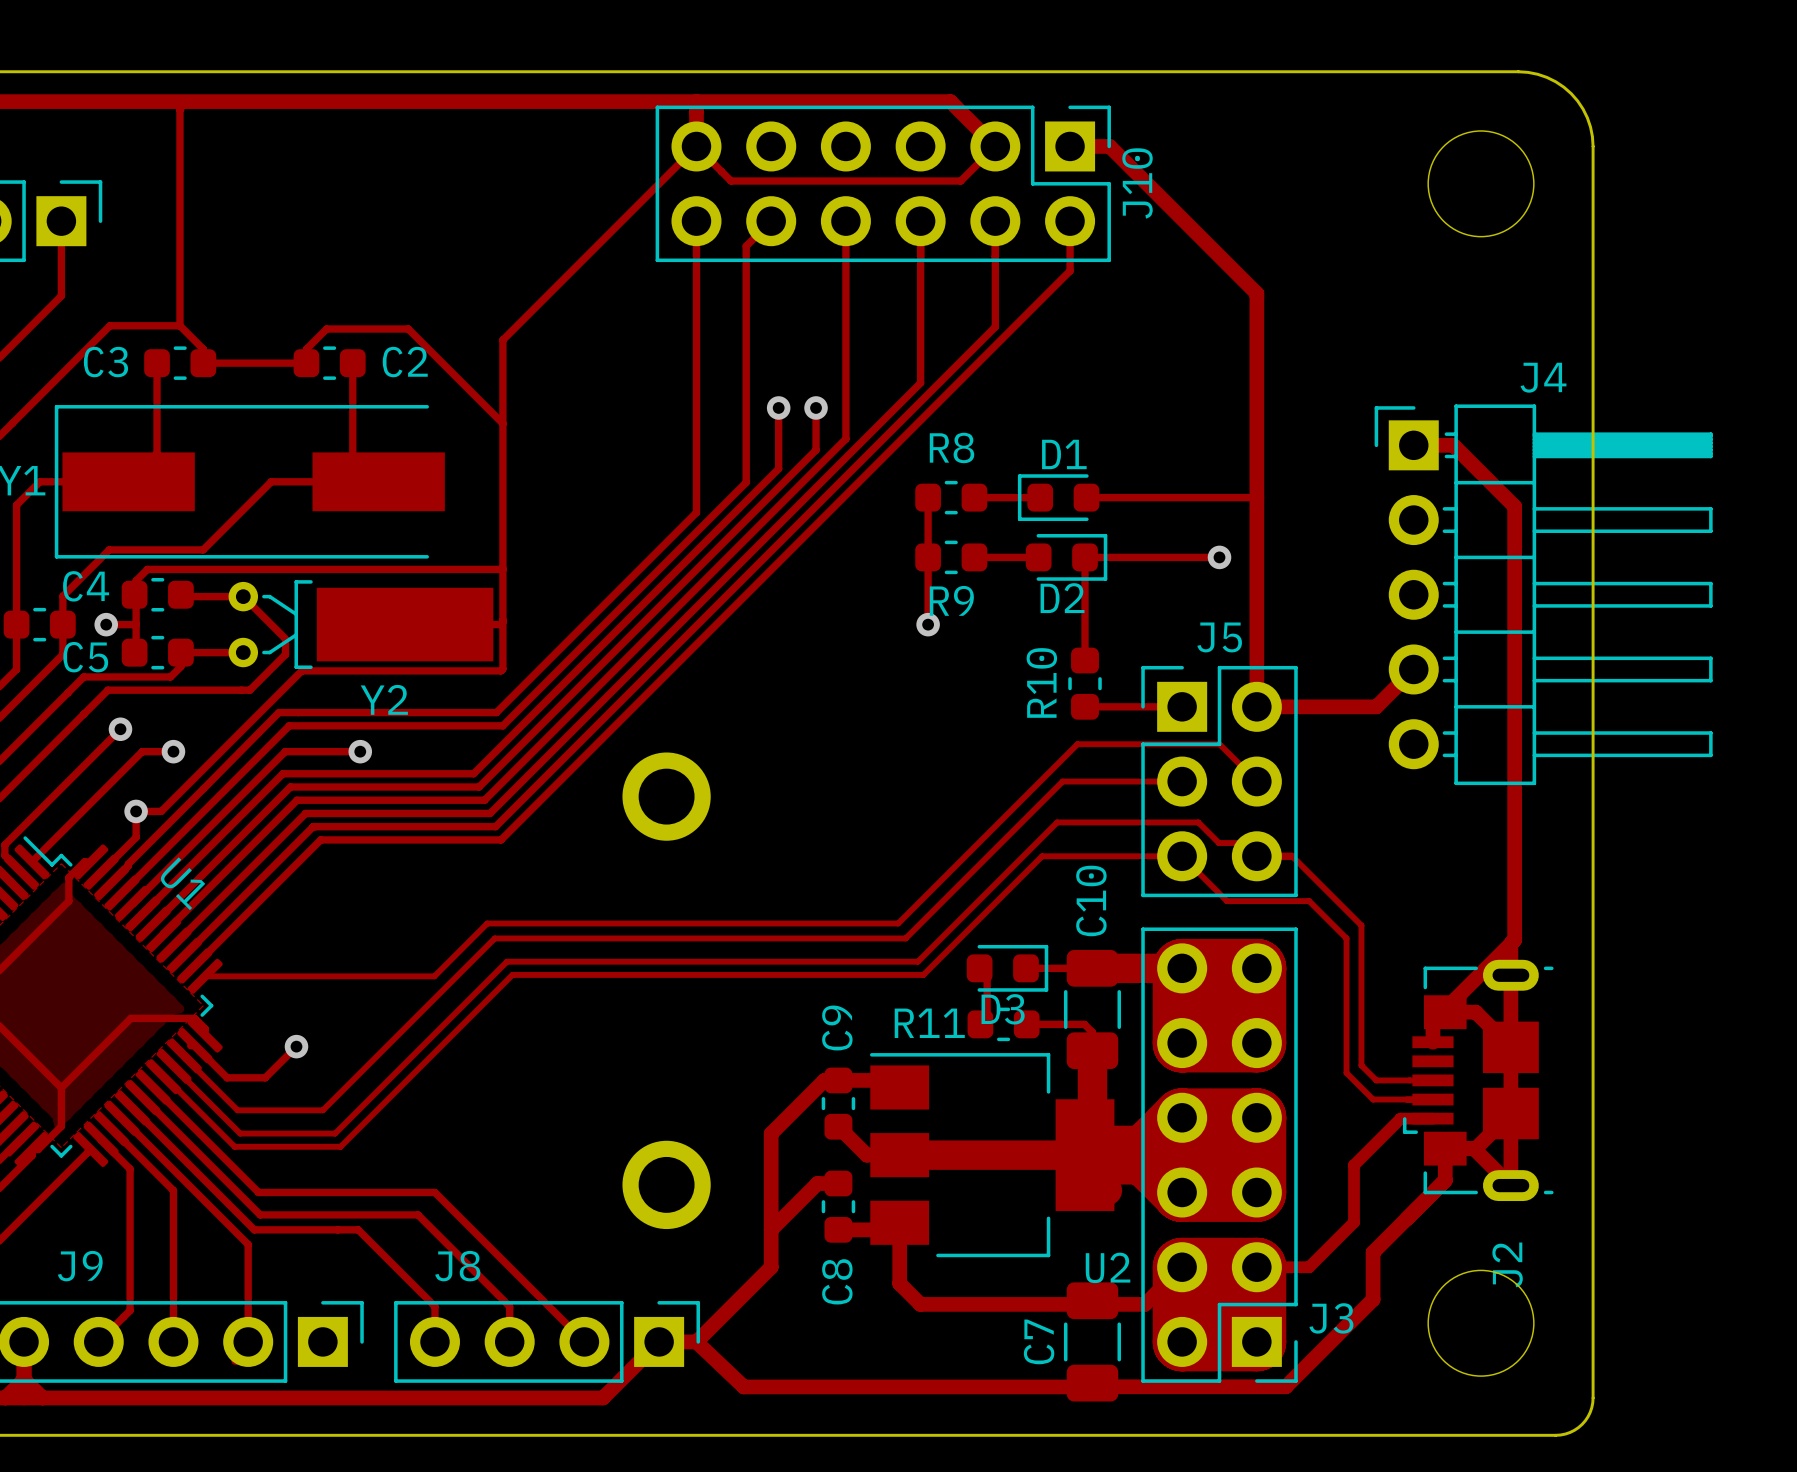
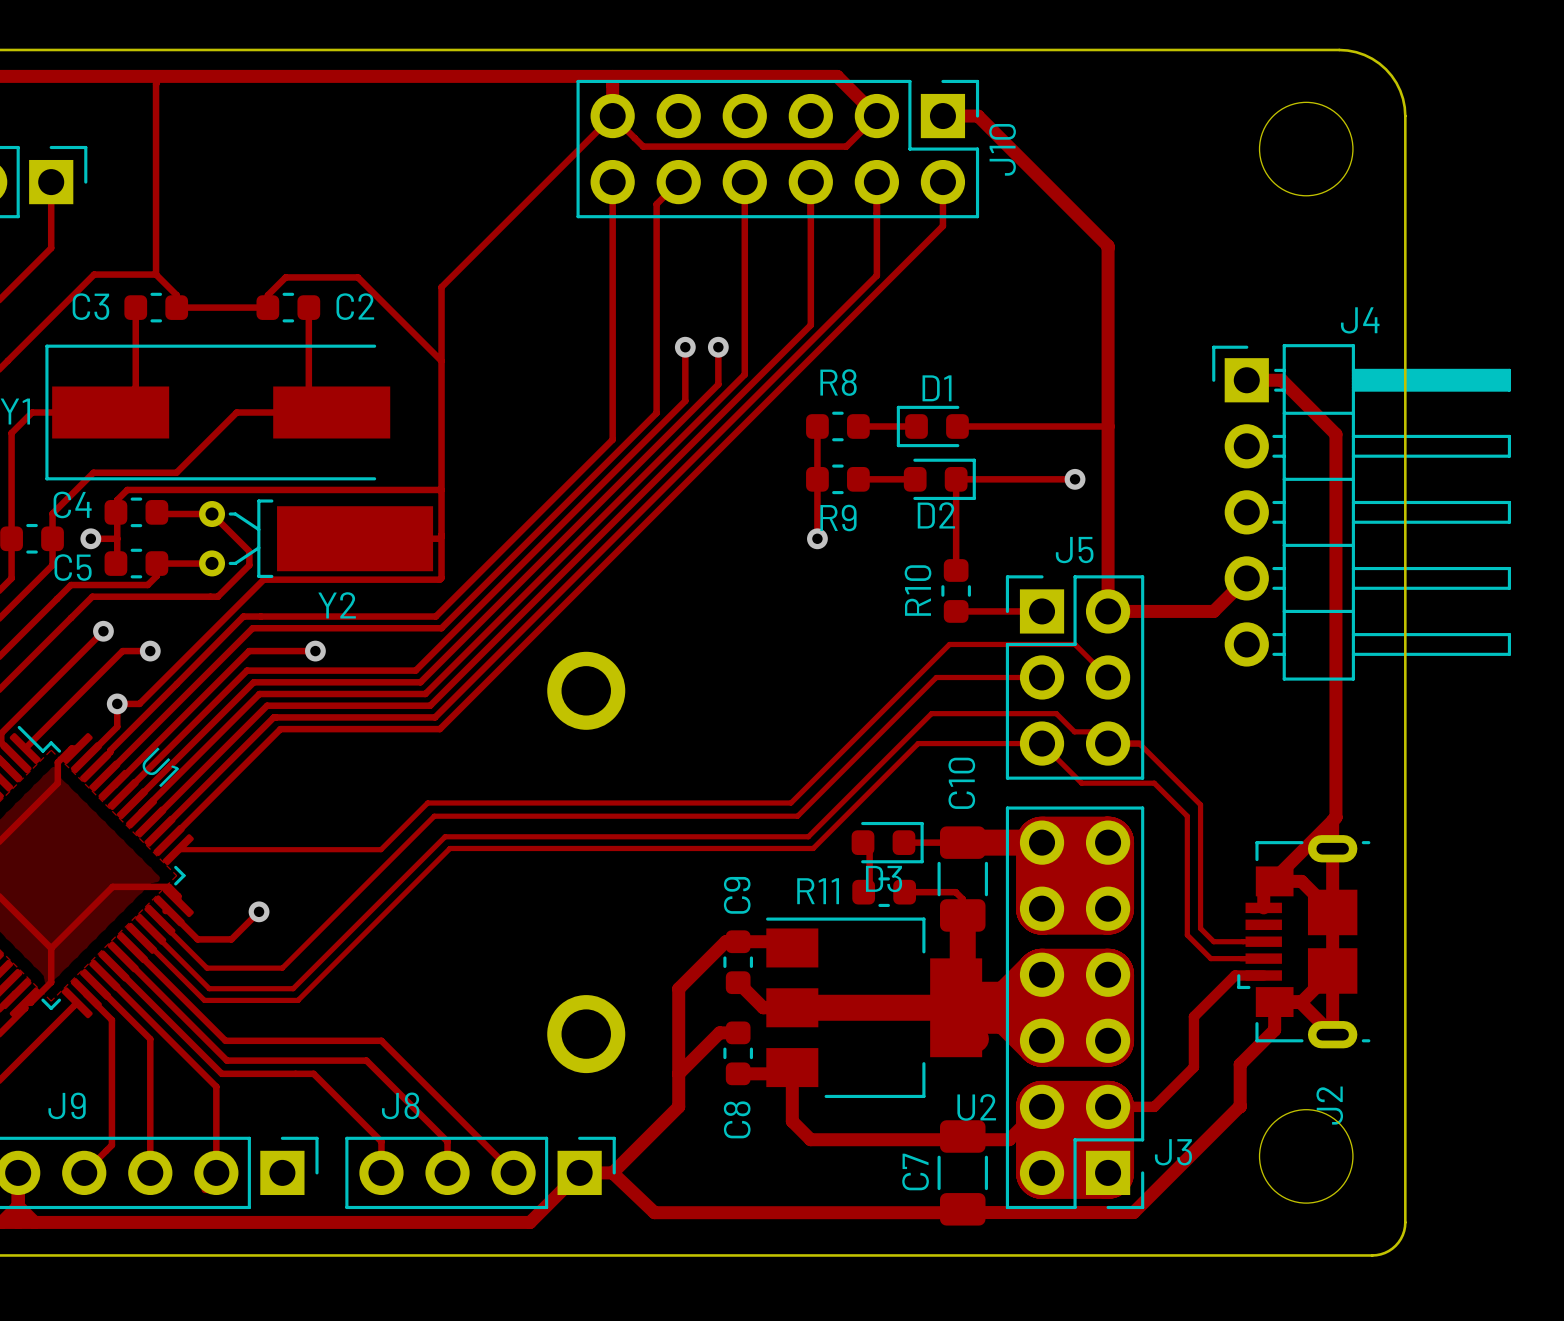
track: (1406, 1219) (1373, 1252) (1373, 1299) -> (1240, 1064) (1240, 1106)
track: none -> (1240, 1106) (1210, 1135)

